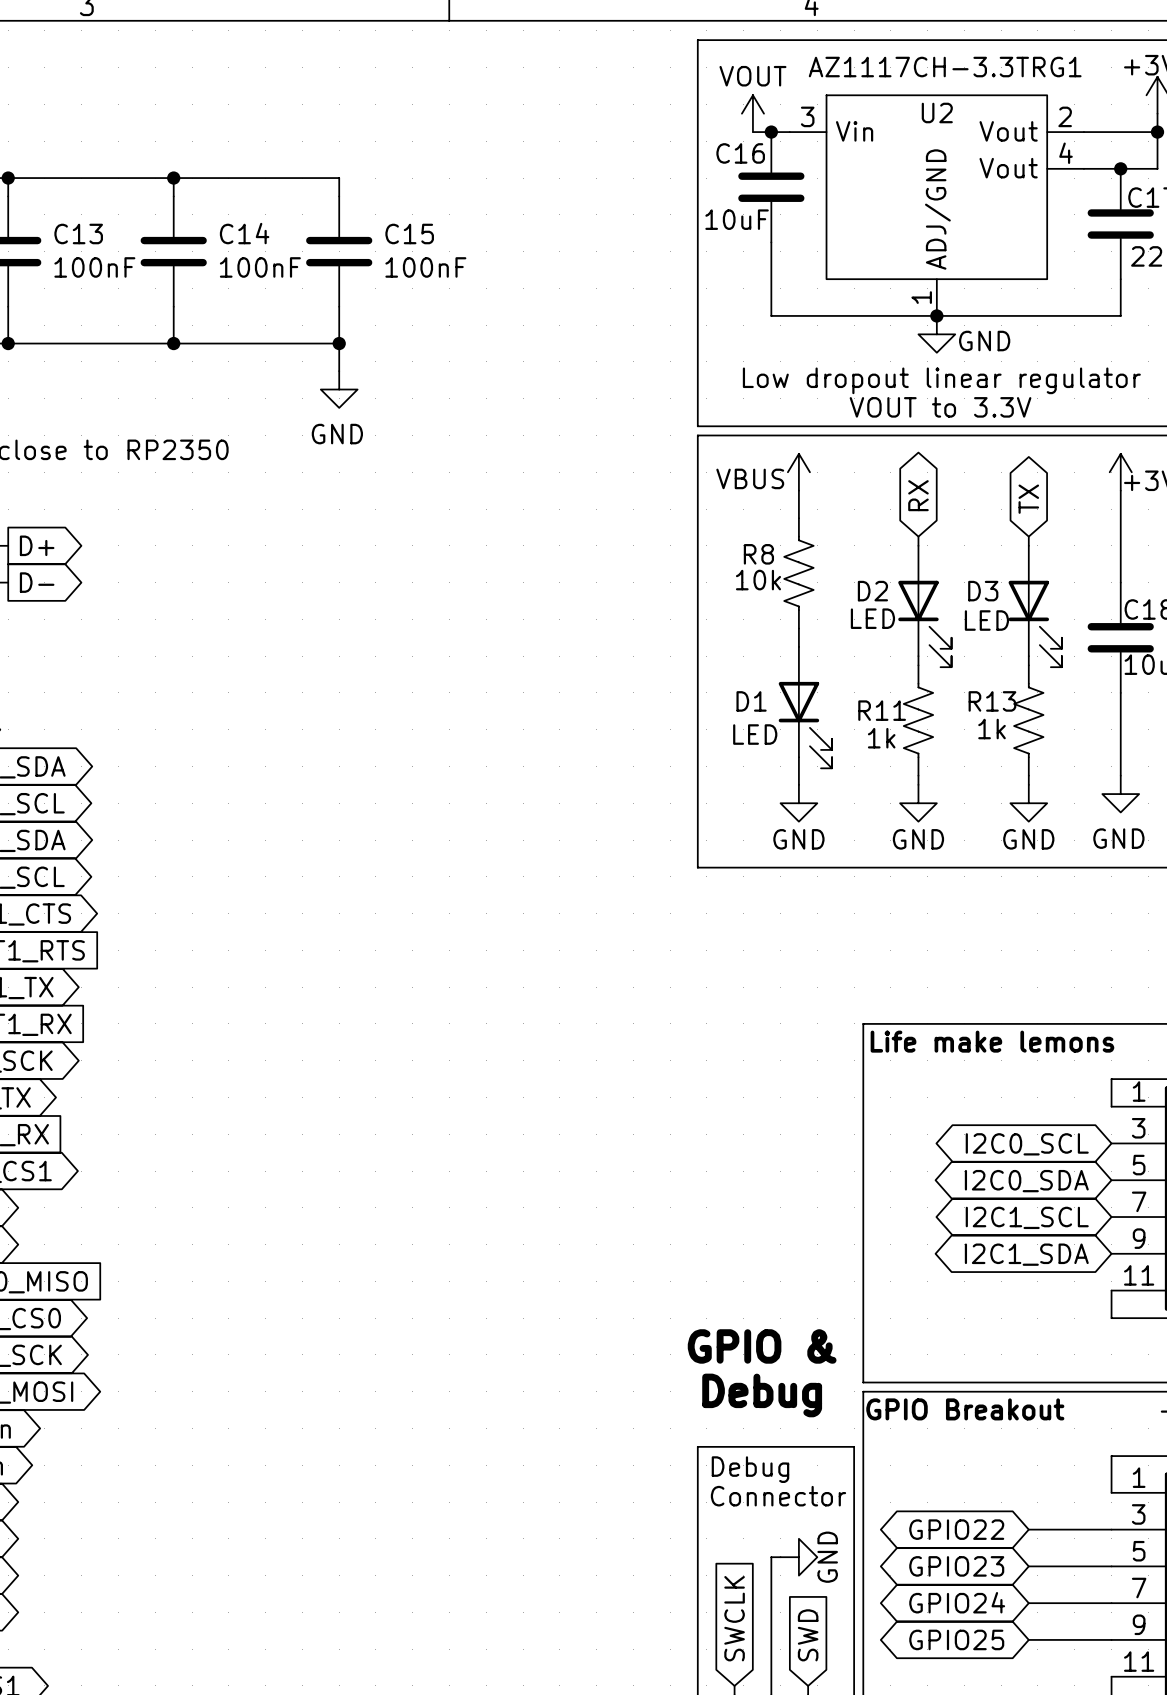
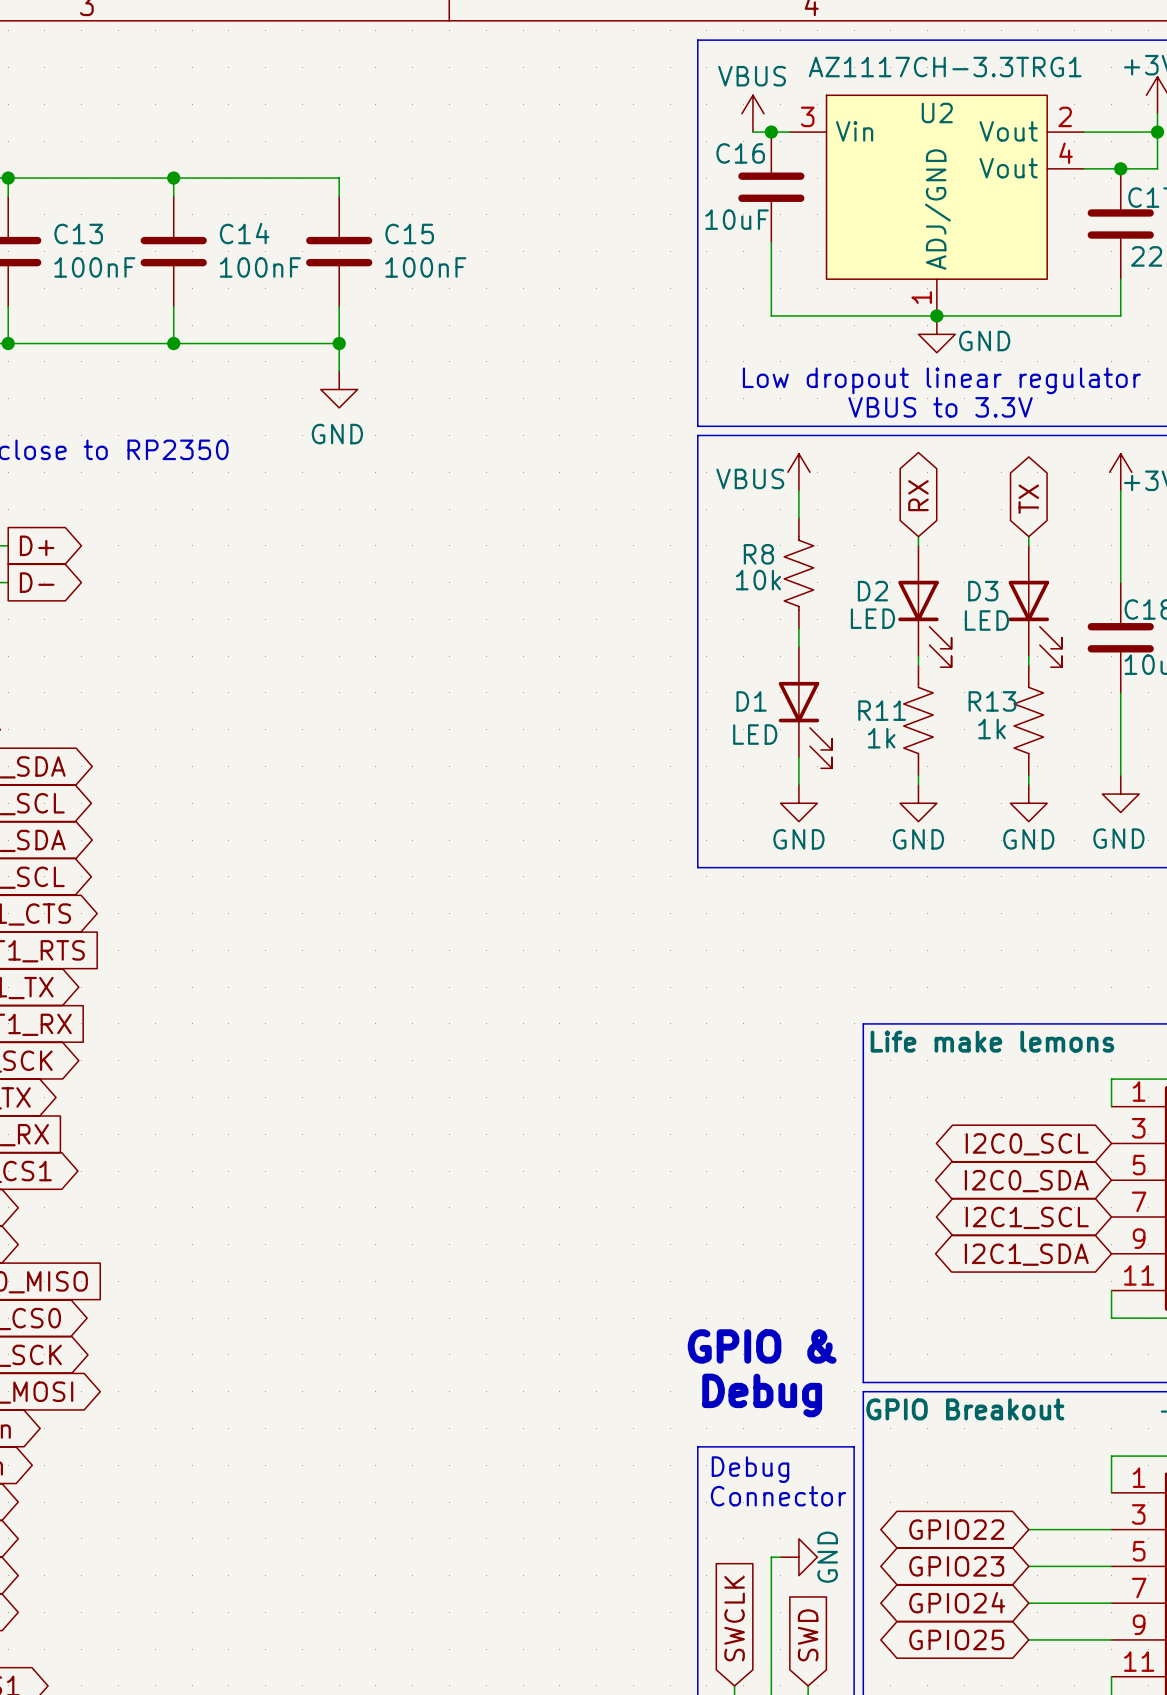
power symbol: VOUT (752, 113) -> VBUS (752, 113)
text: VOUT to 3.3V (940, 407) -> VBUS to 3.3V (940, 407)

